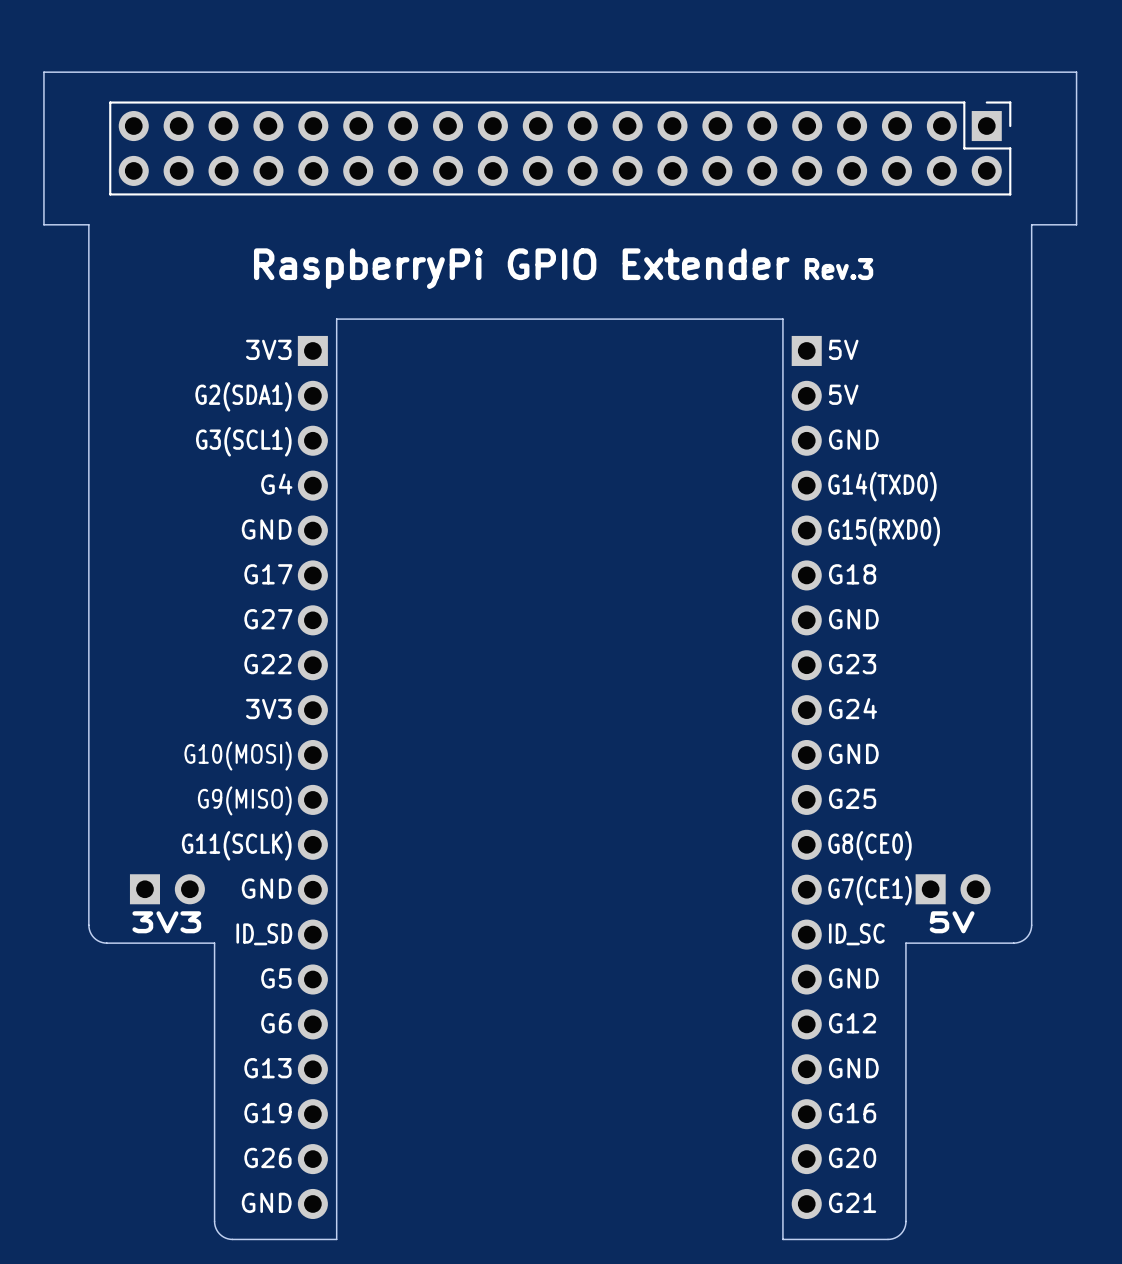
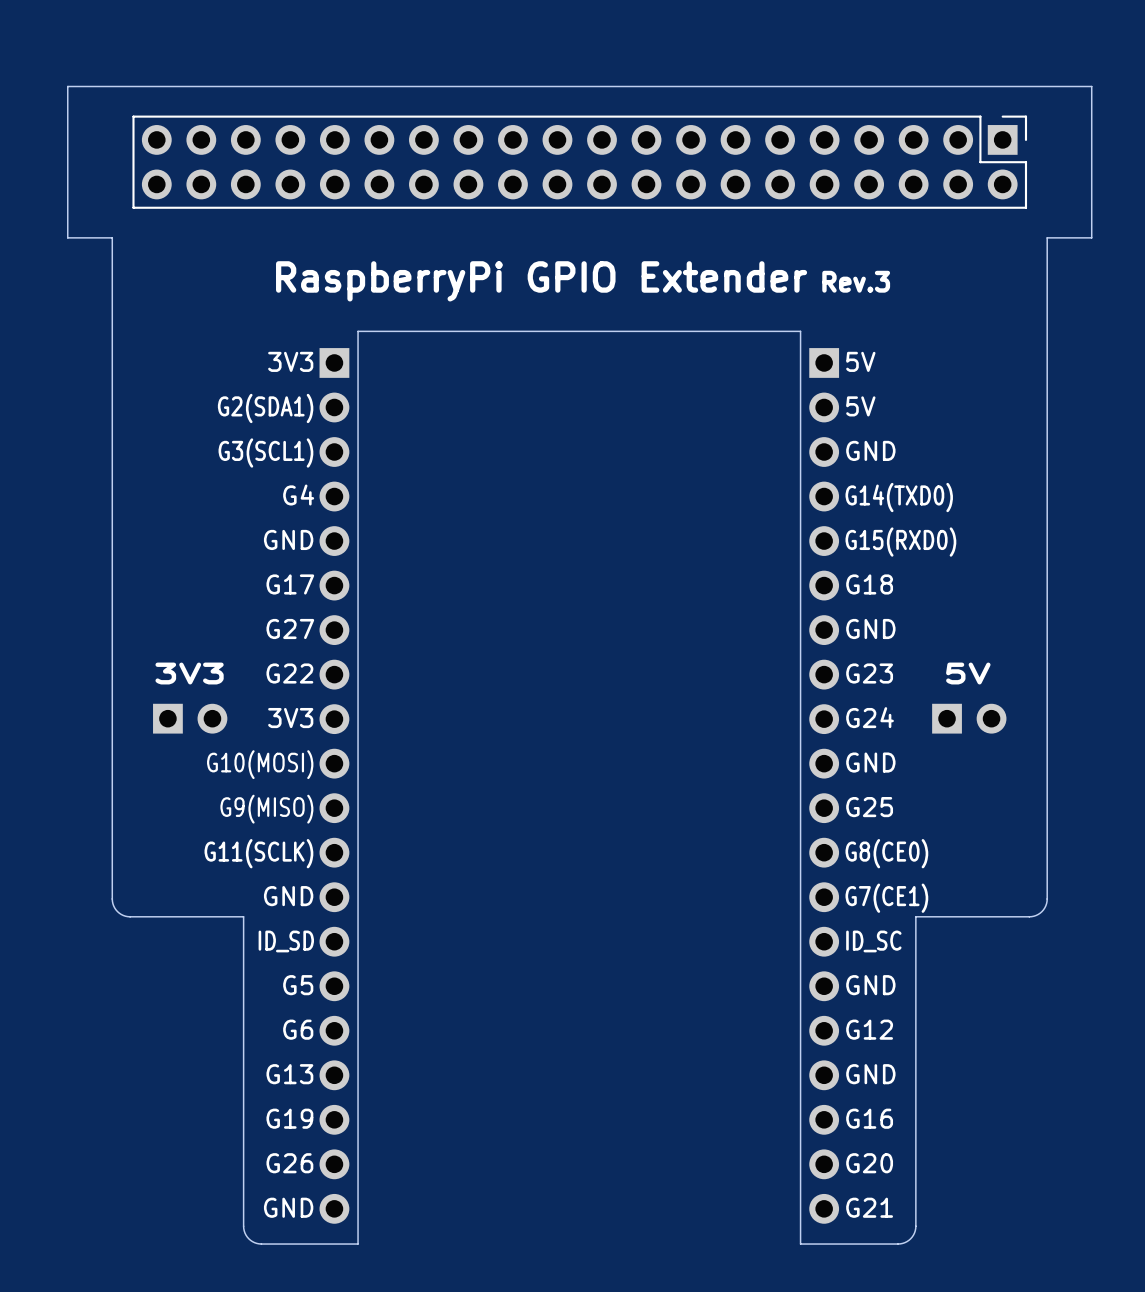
part position: (167, 889) -> (190, 718)
part position: (953, 889) -> (969, 718)
board edge: (88, 891) (89, 929) (92, 936) (99, 941) (214, 943) (214, 1223) (216, 1230) (223, 1237) (239, 1239) -> (112, 898) (115, 909) (127, 916) (243, 916) (243, 1226) (248, 1238) (261, 1244)
board edge: (1031, 891) (1031, 929) (1026, 937) (1020, 941) (905, 943) (905, 1223) (902, 1232) (896, 1237) (881, 1239) -> (1047, 898) (1041, 911) (1031, 916) (915, 916) (915, 1226) (910, 1238) (898, 1244)
text position: 3V3 (166, 922) -> 3V3 (189, 673)
text position: 5V (952, 922) -> 5V (968, 673)

